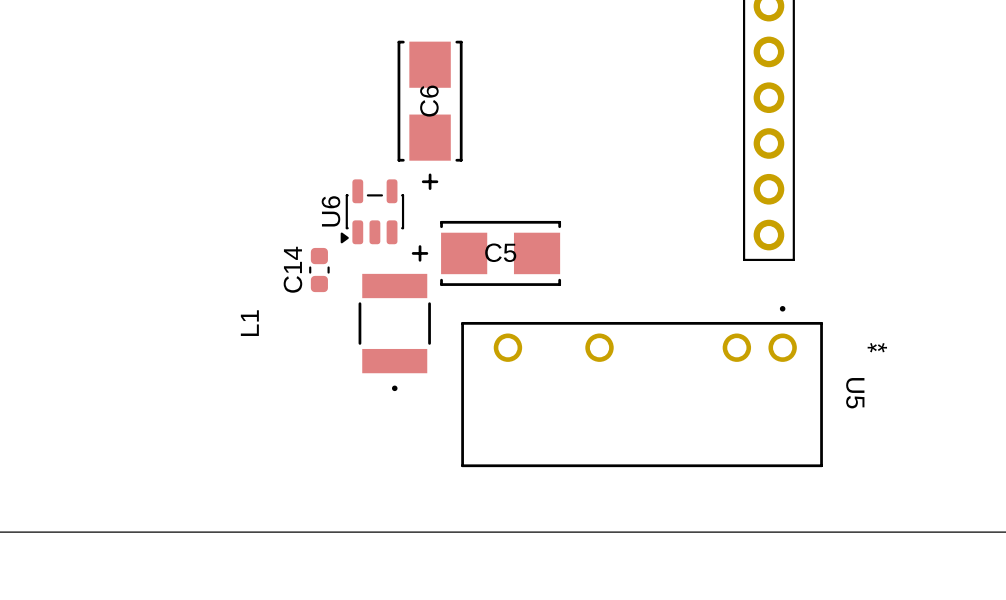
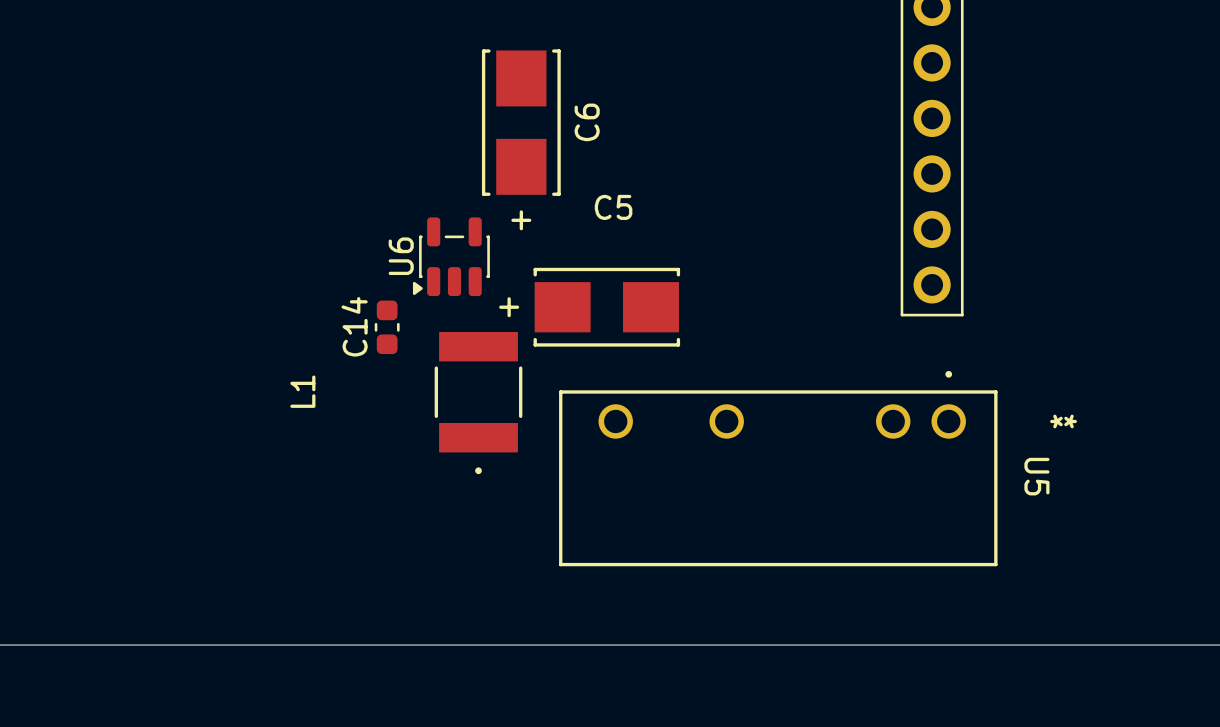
C6 name position: C6 (429, 101) -> C6 (587, 122)
C5 name position: C5 (500, 252) -> C5 (613, 207)

